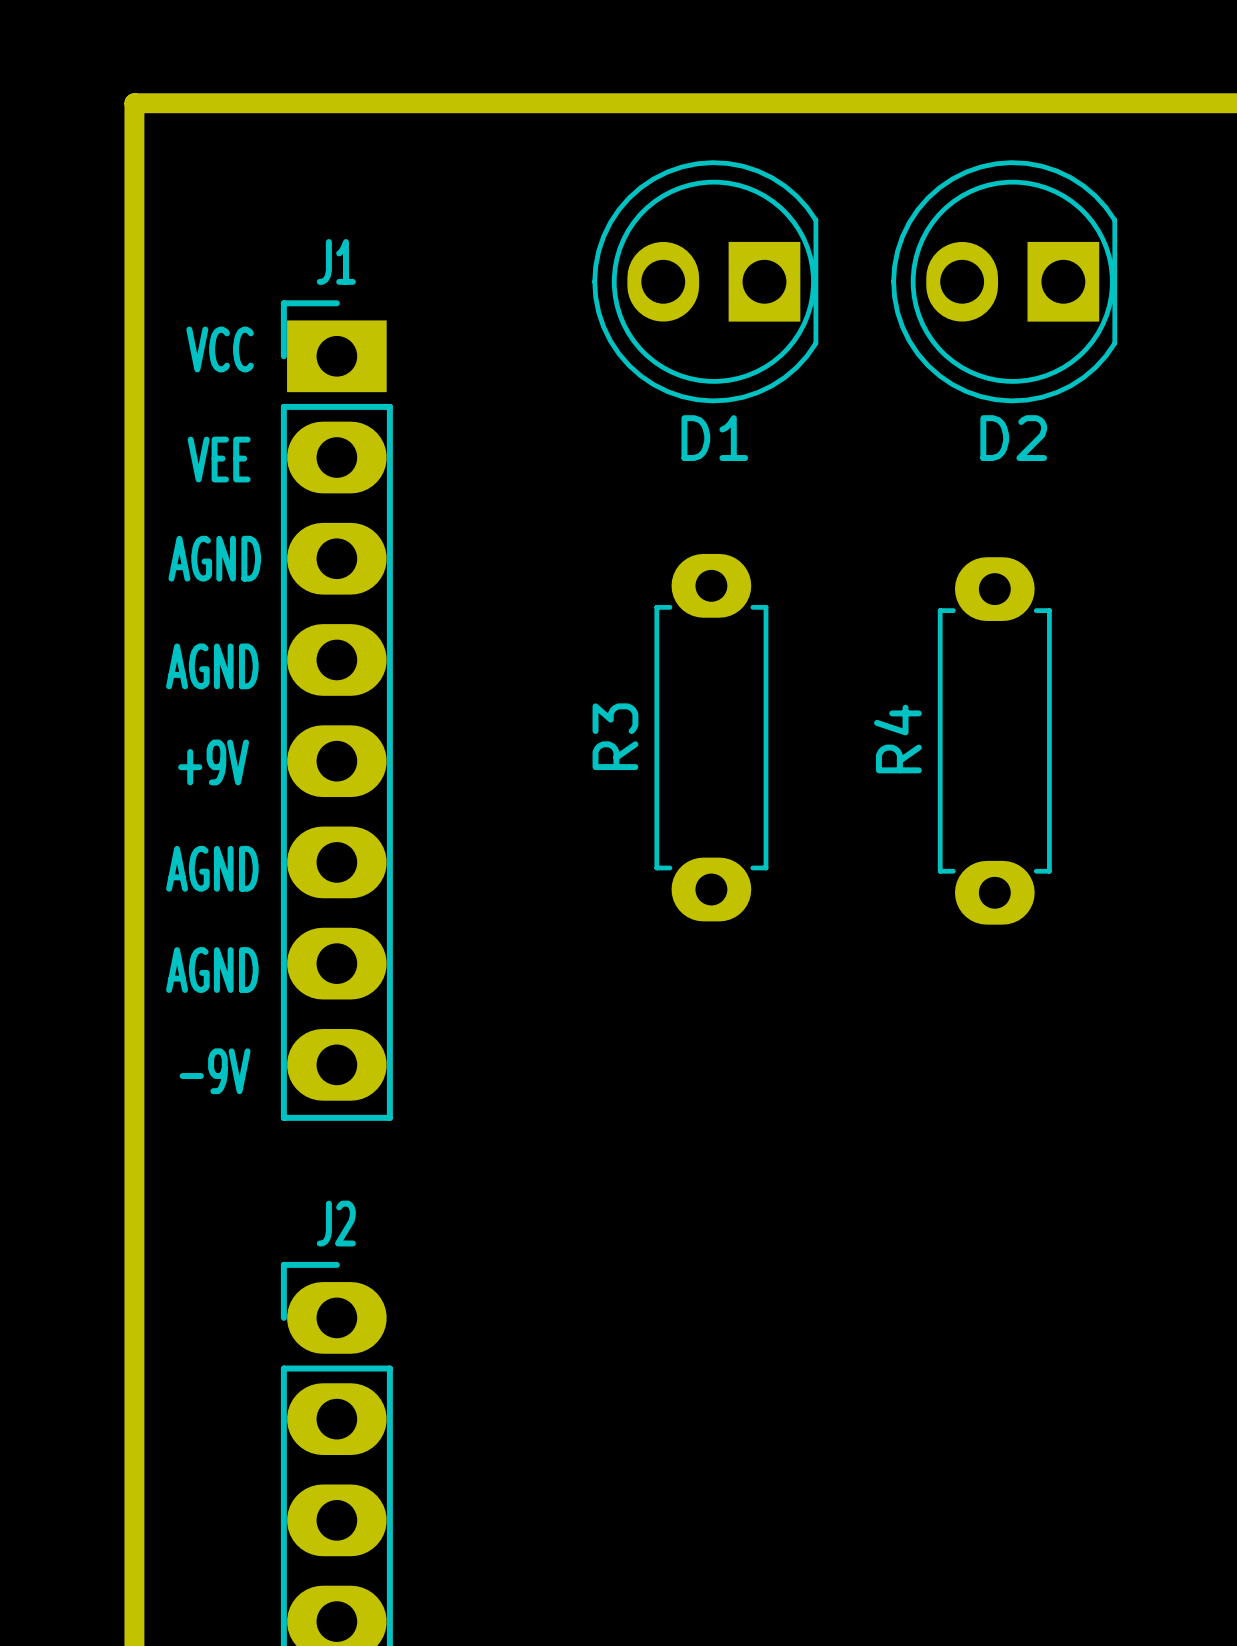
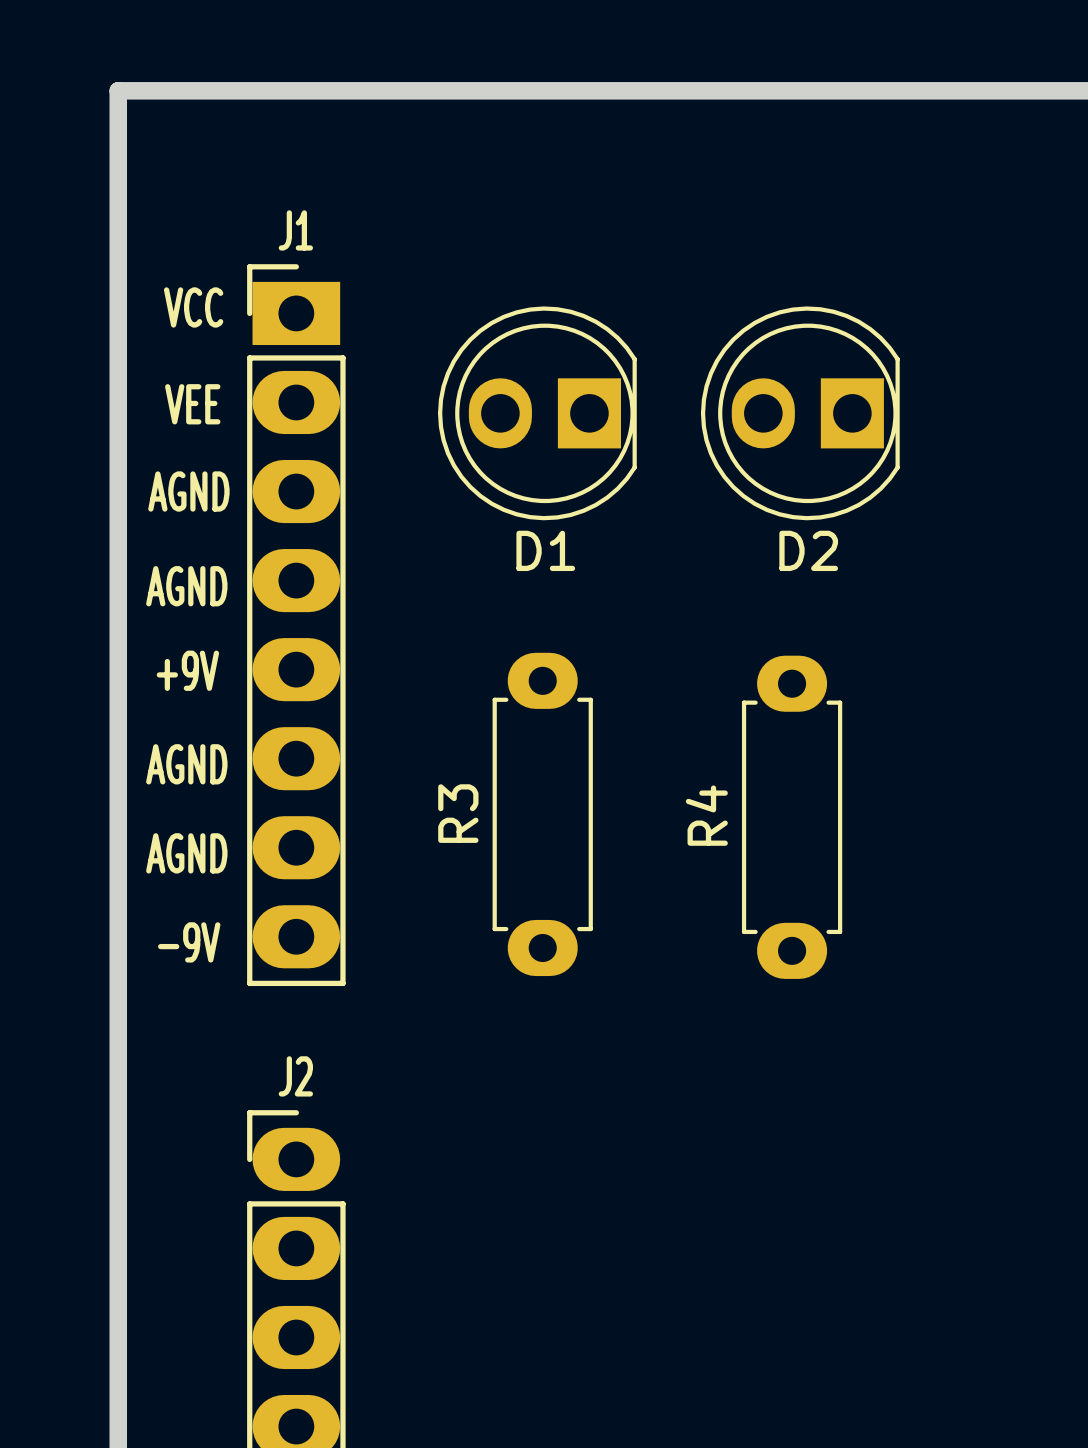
D1 position: (705, 281) -> (537, 413)
D2 position: (1004, 281) -> (800, 413)
R3 position: (711, 737) -> (542, 814)
R4 position: (994, 740) -> (792, 817)

